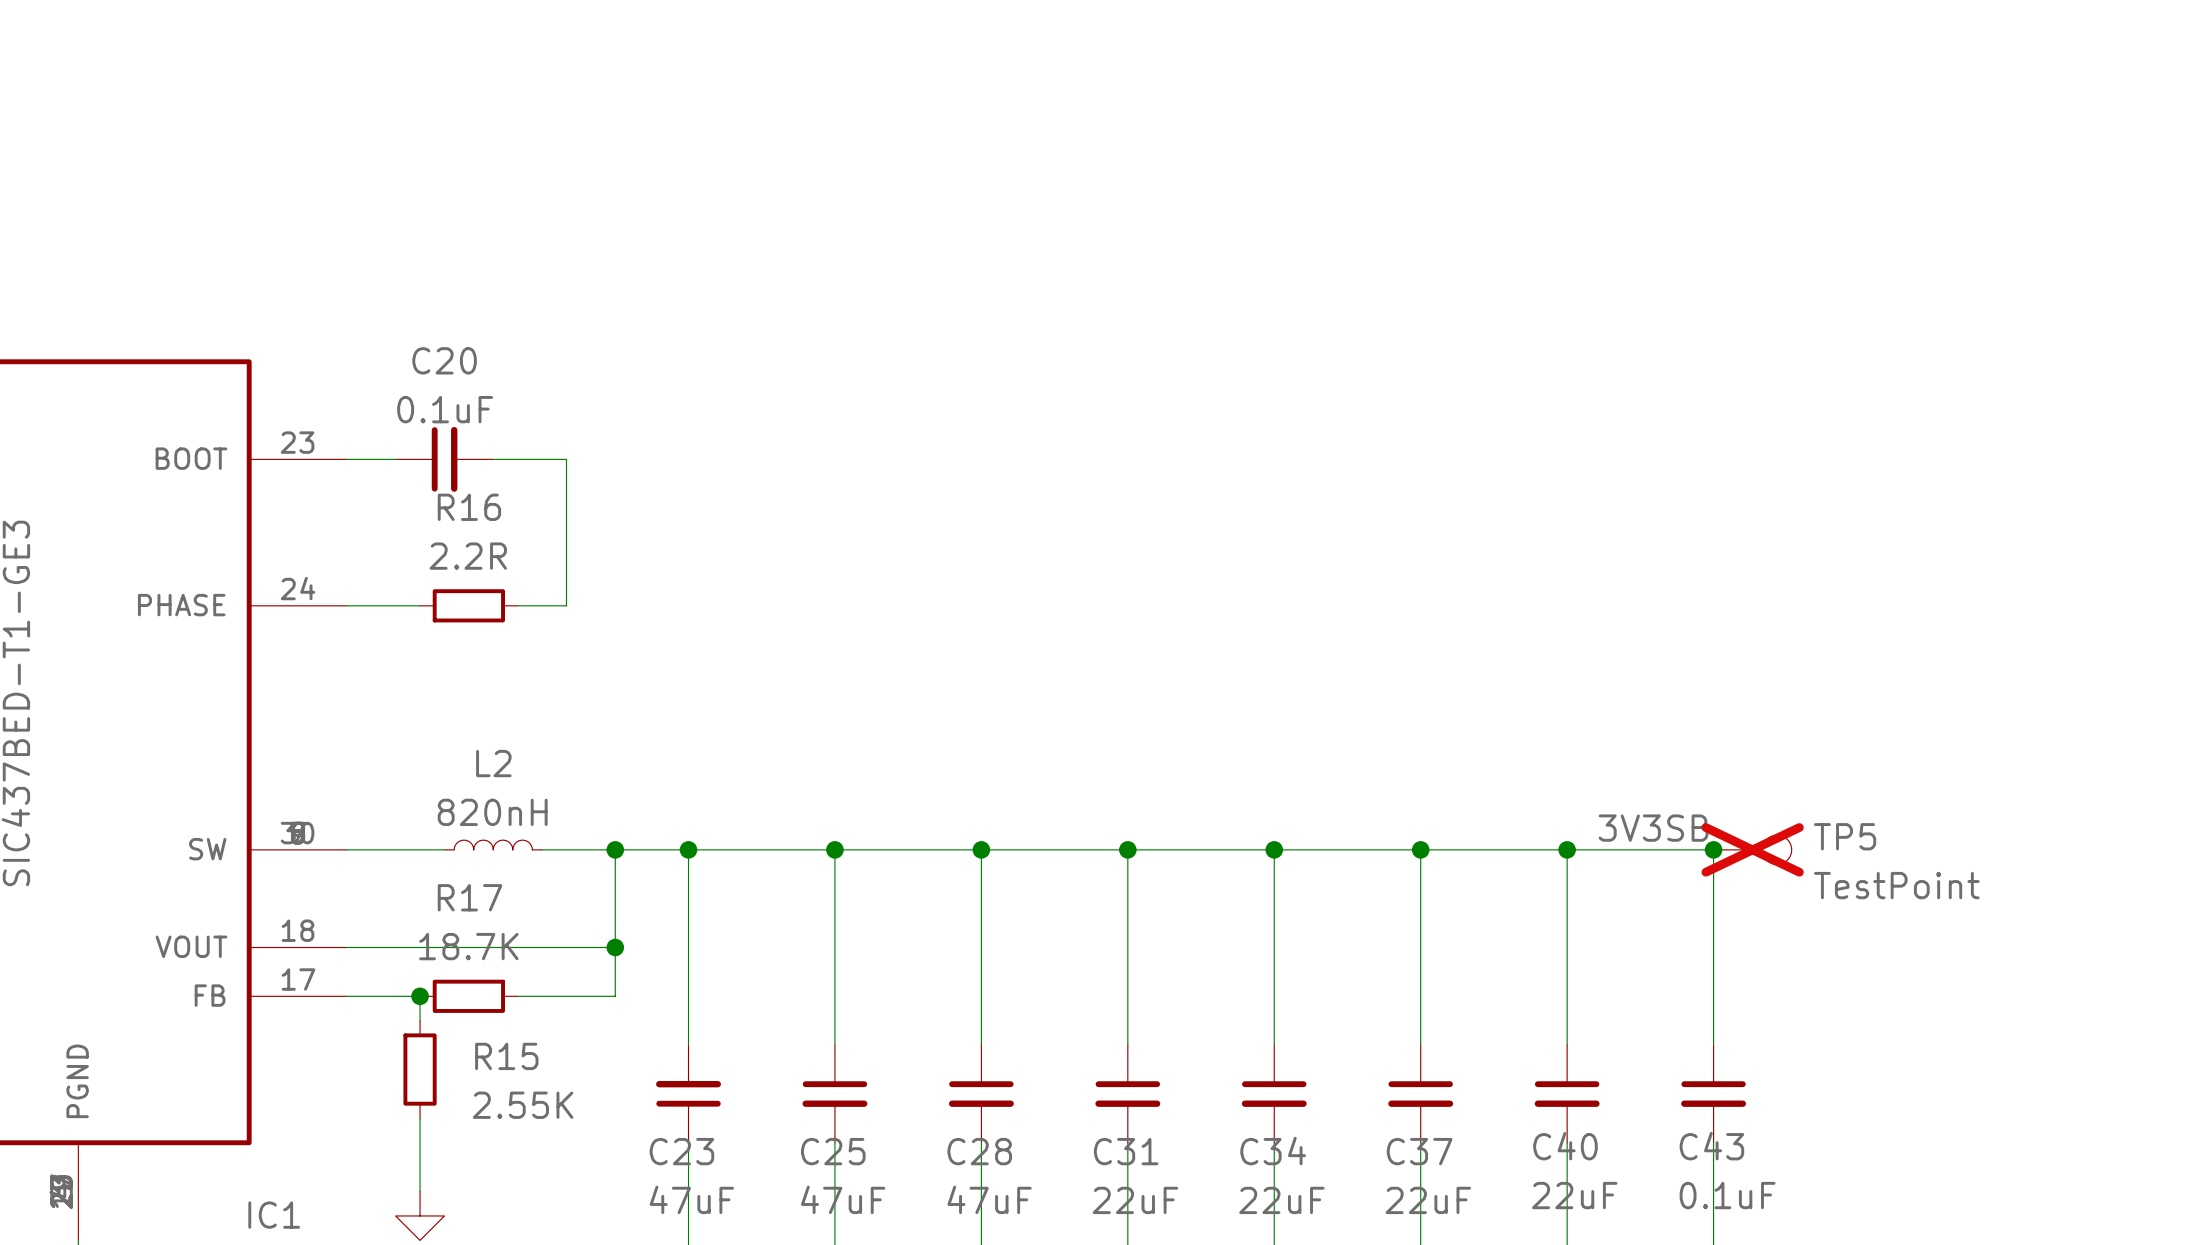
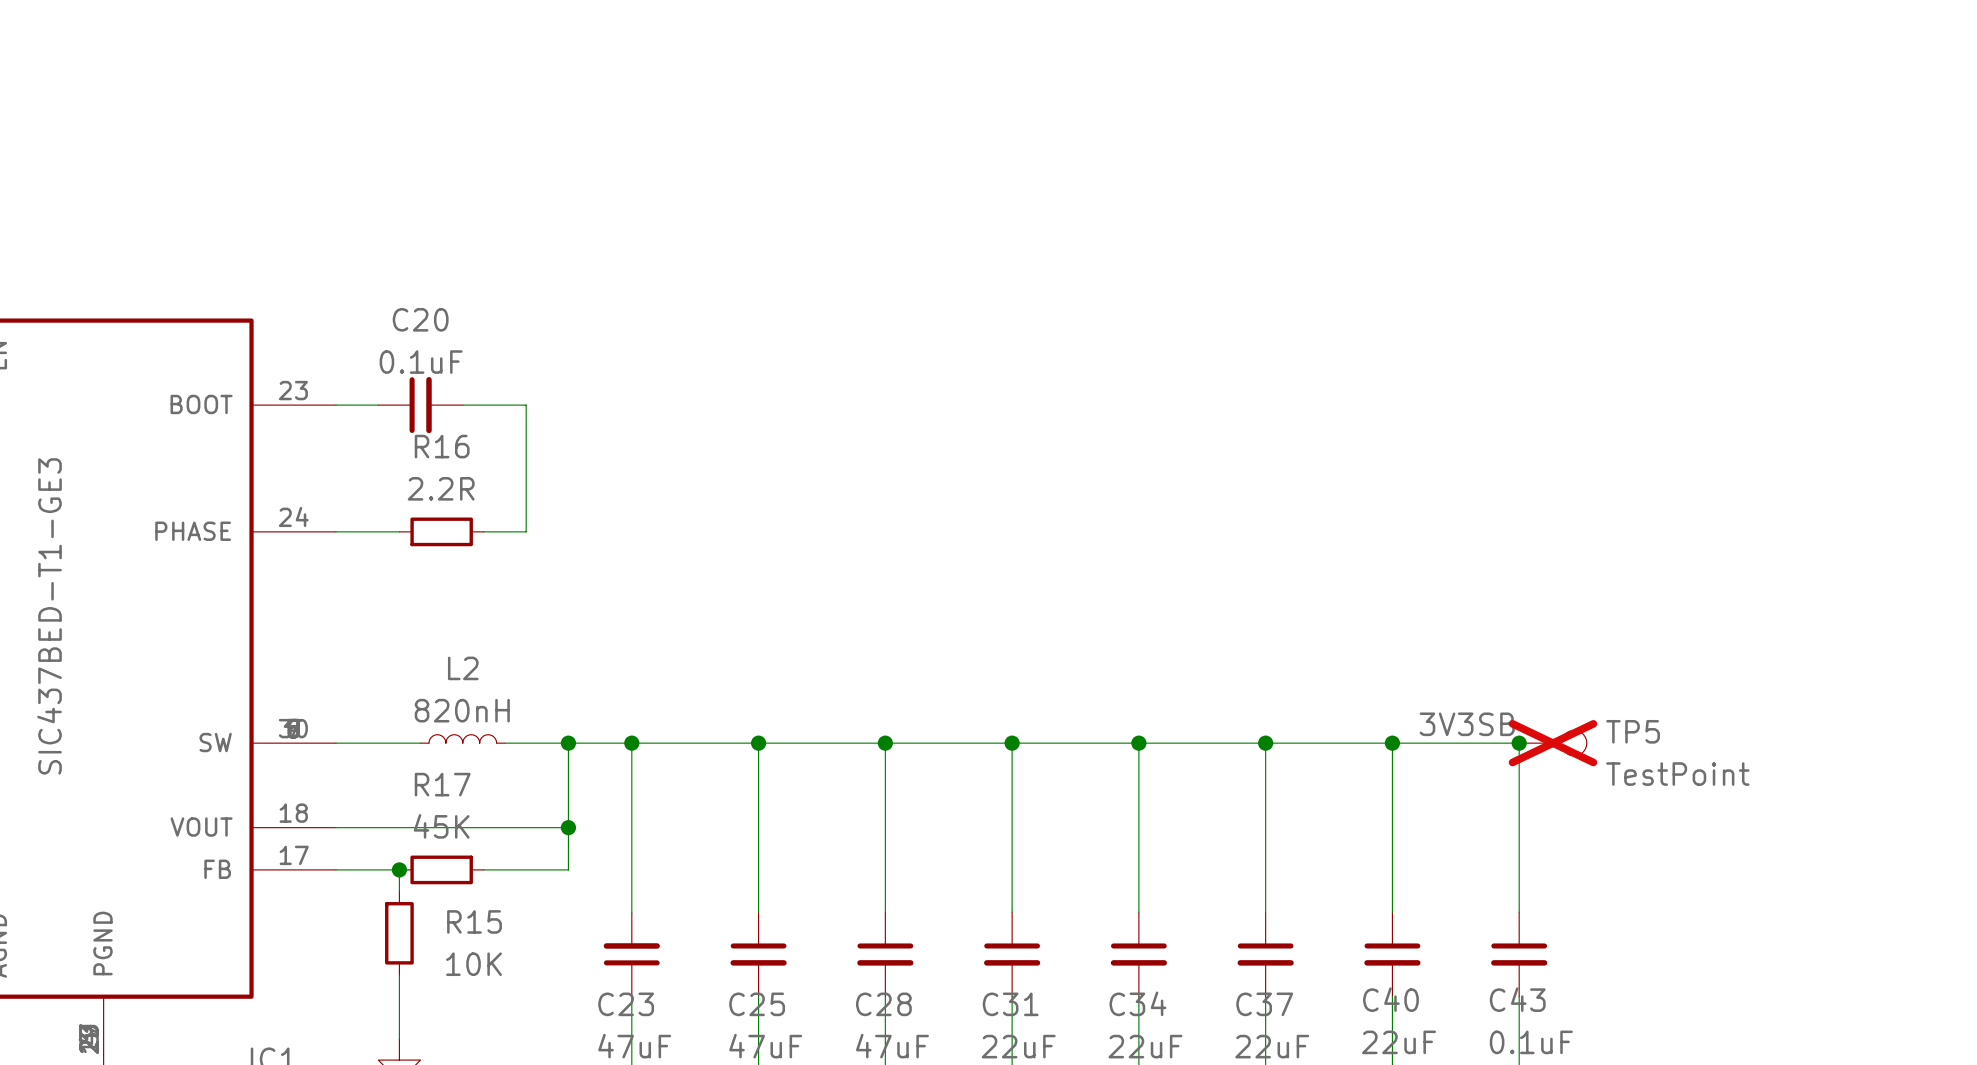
R17 value: 18.7K (468, 946) -> 45K (441, 826)
R15 value: 2.55K (523, 1105) -> 10K (474, 964)

